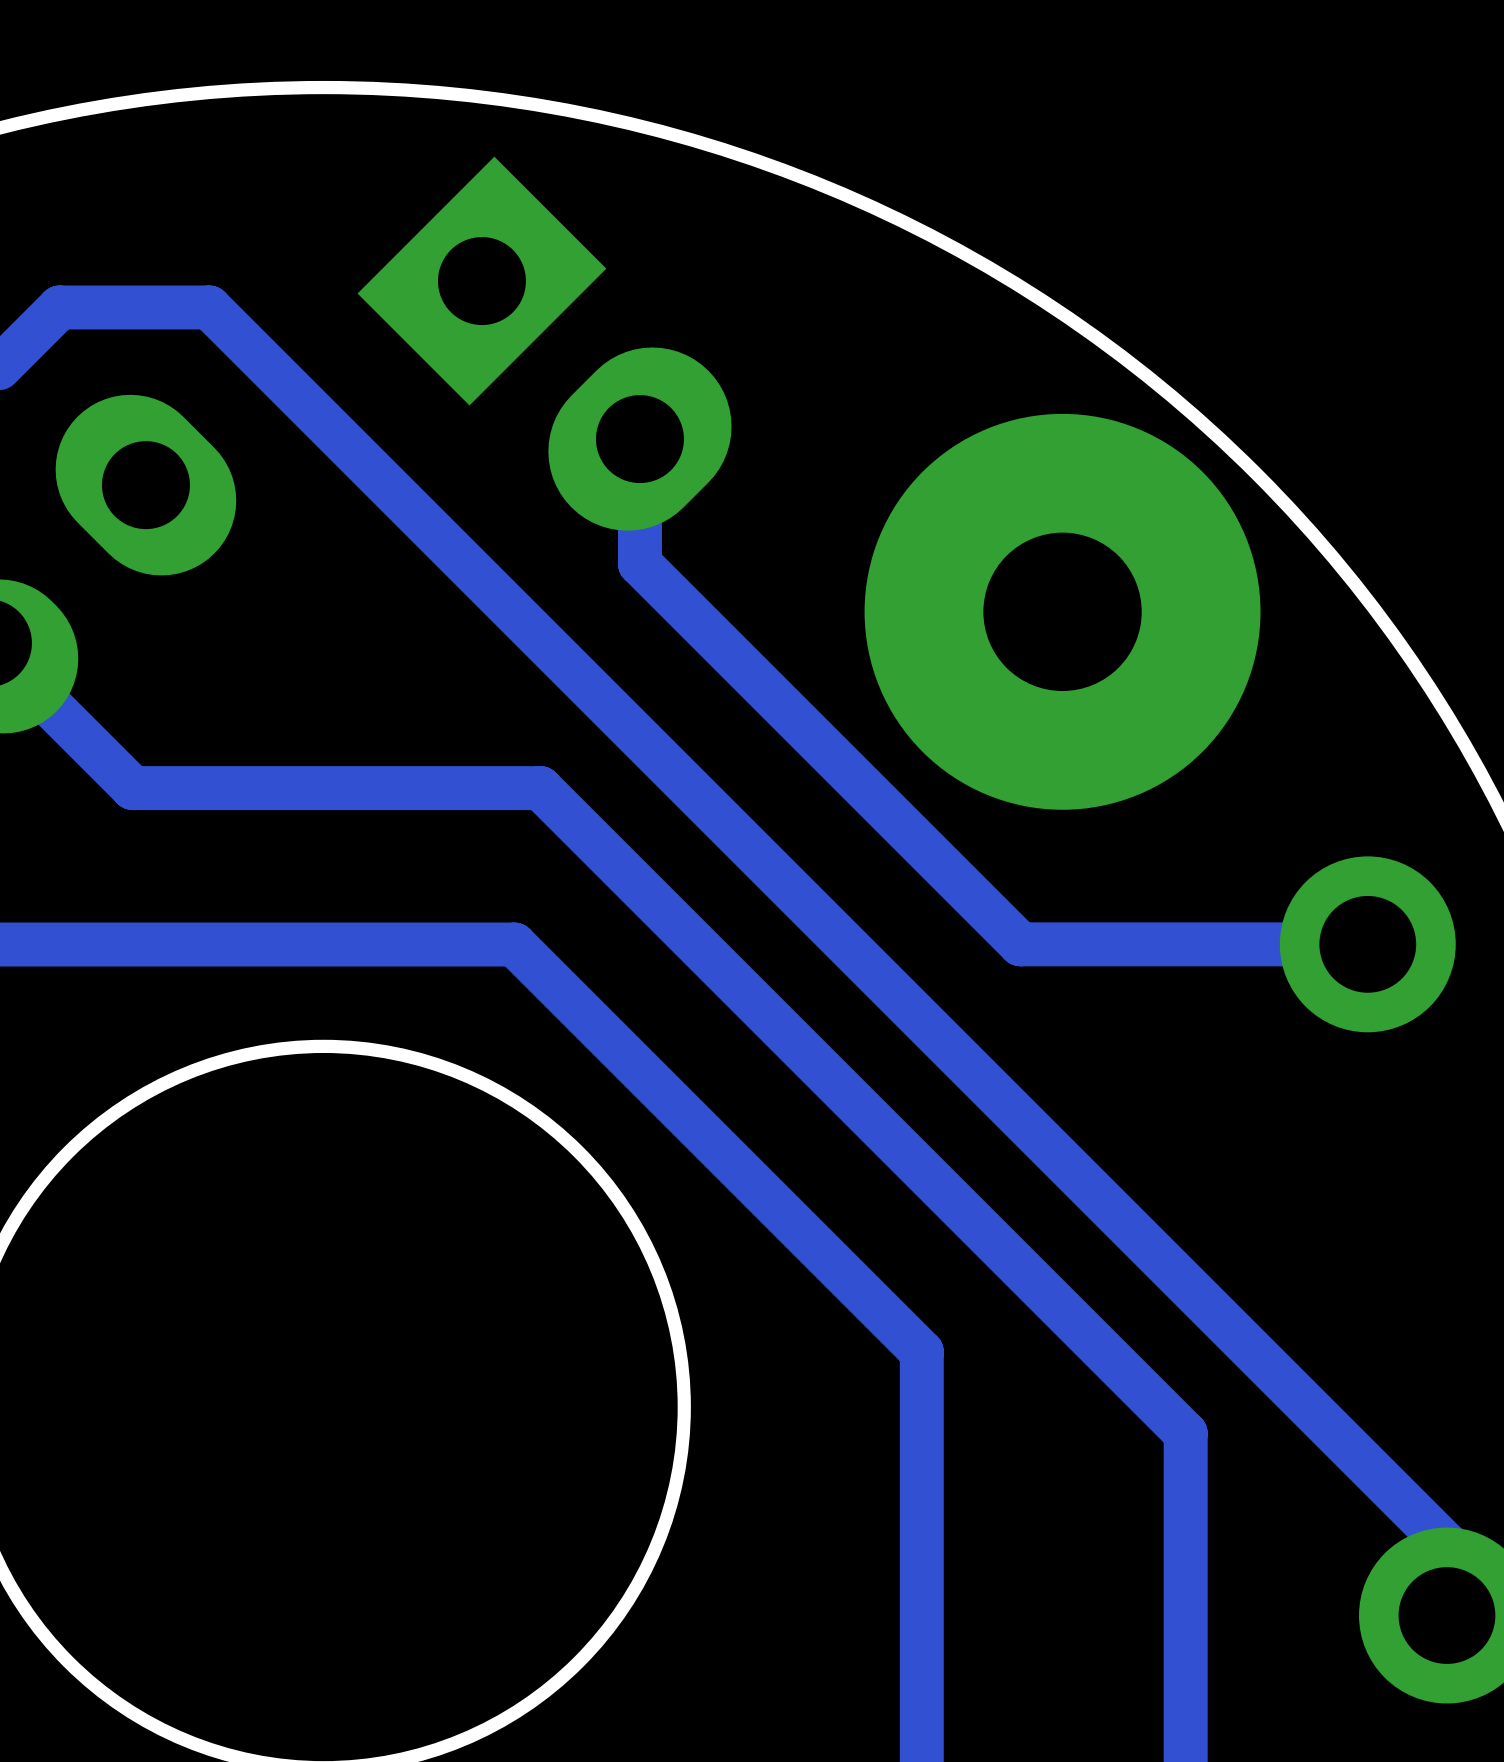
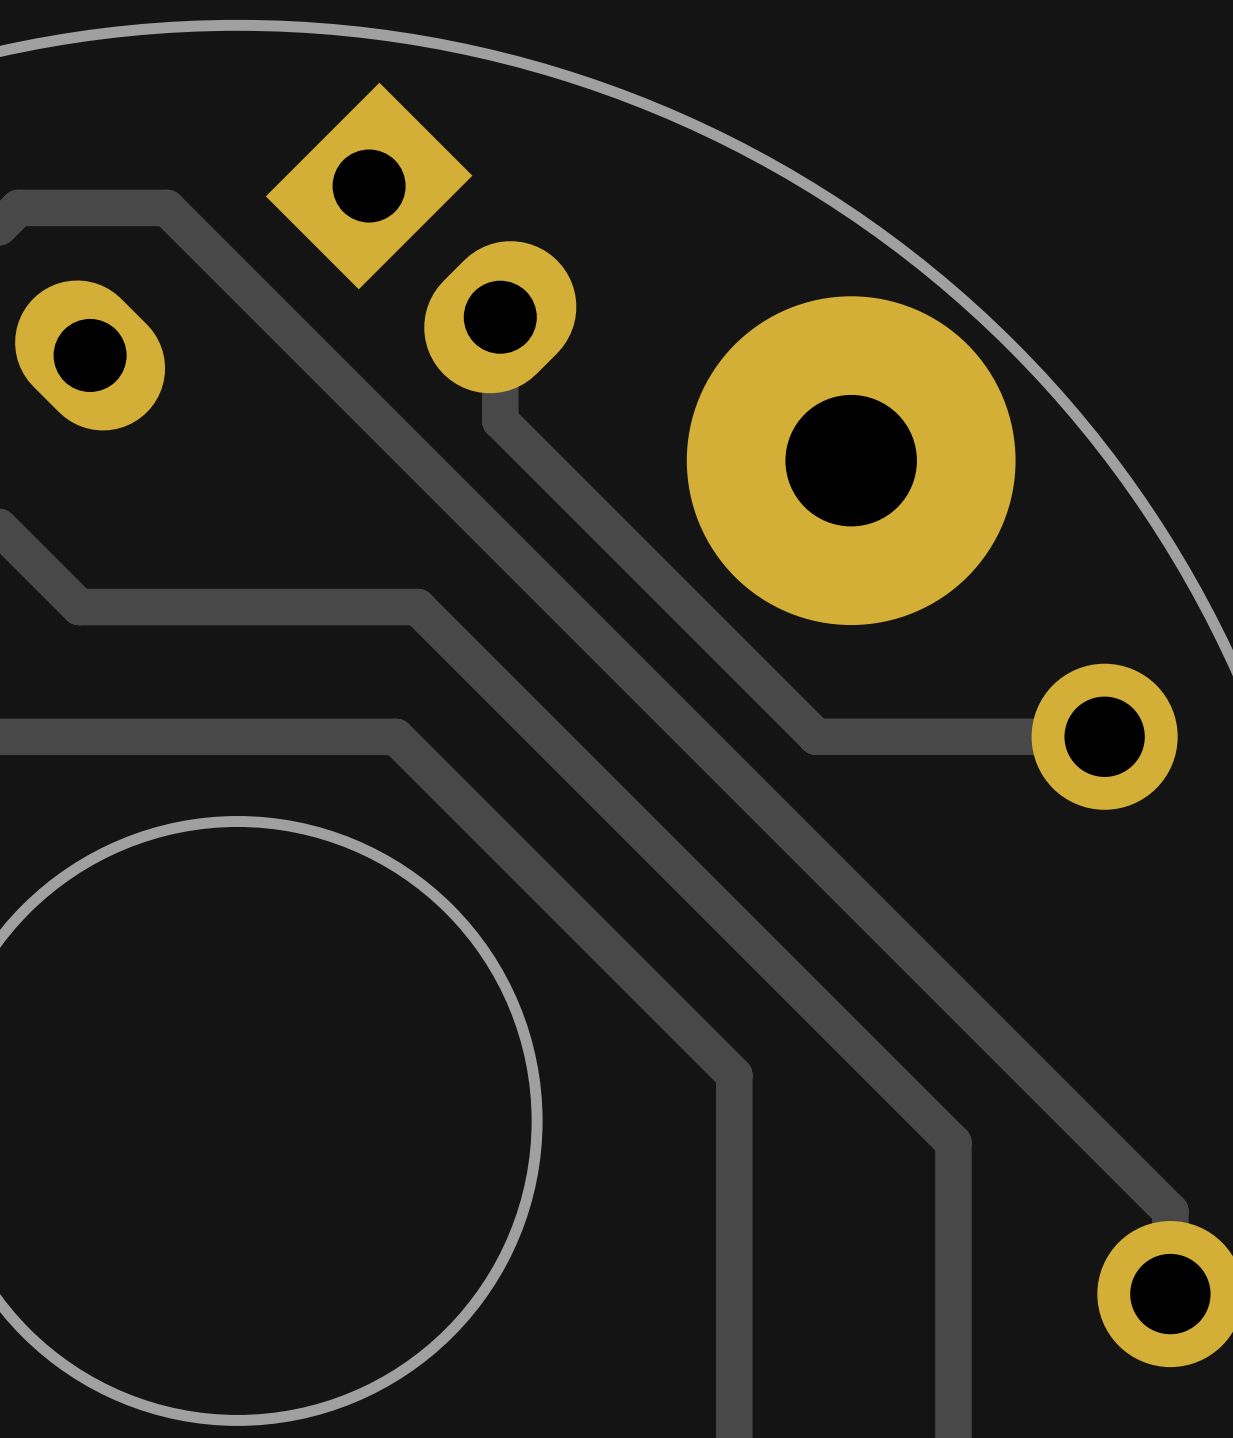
track: (209, 307) (1446, 1545) -> (142, 207) (166, 207) (1170, 1211) (1170, 1235)

